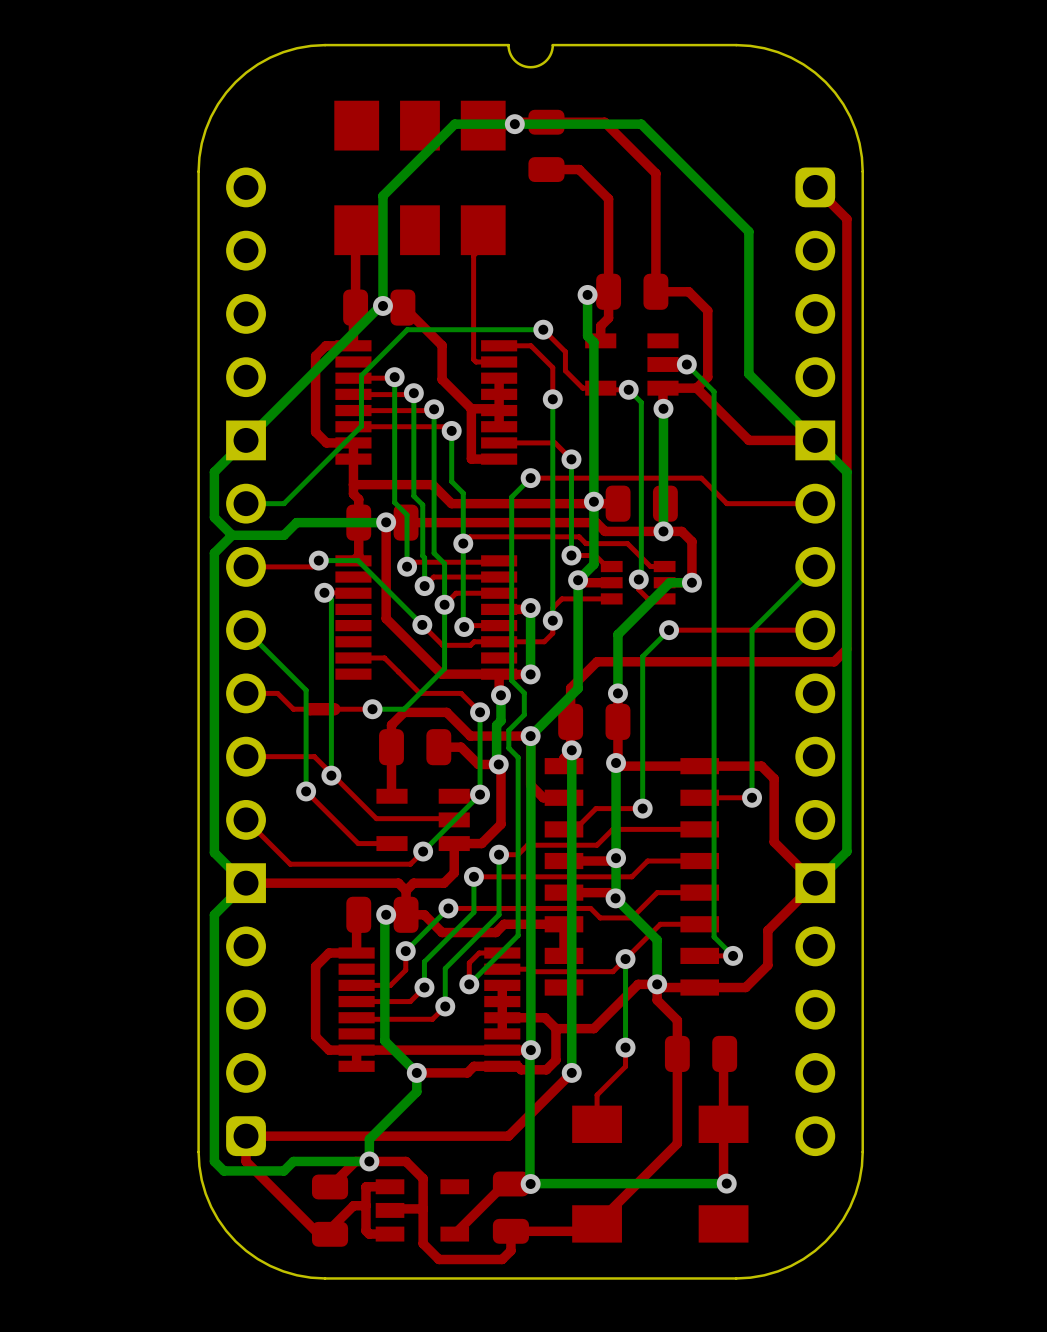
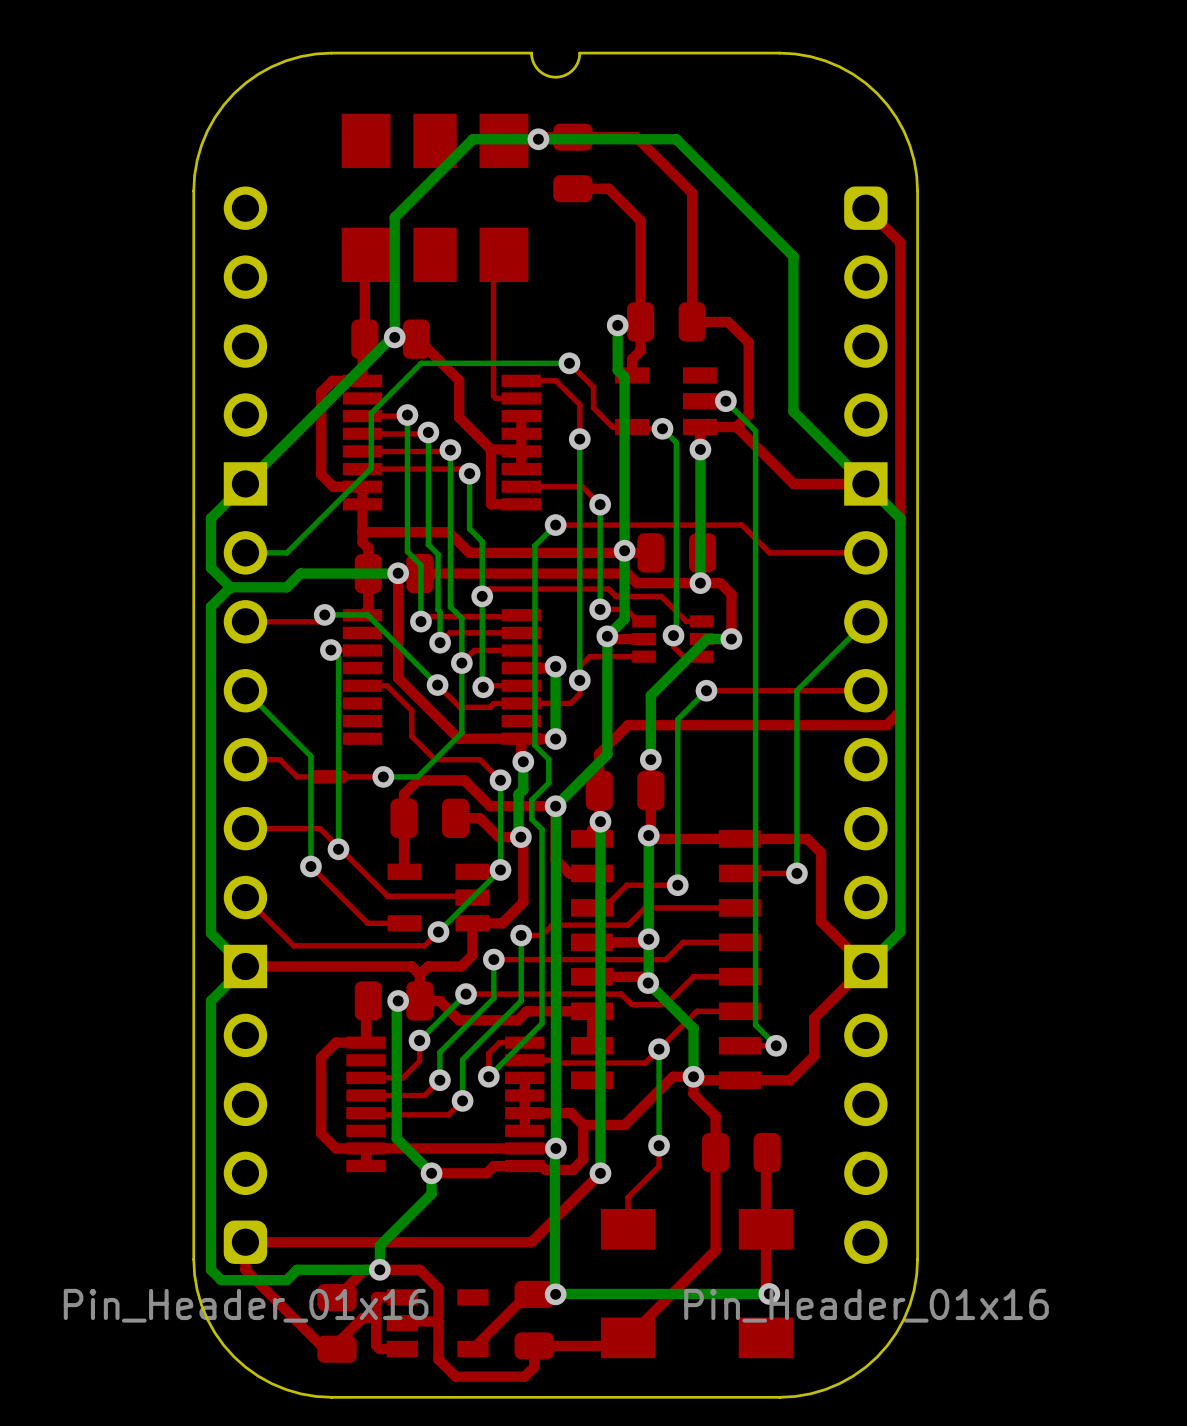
top track: (353, 657) (384, 657) (398, 672) -> (362, 685) (386, 685) (411, 710) (411, 736)
drawing: none -> [63, 1288, 429, 1323]
drawing: none -> [684, 1288, 1049, 1323]

